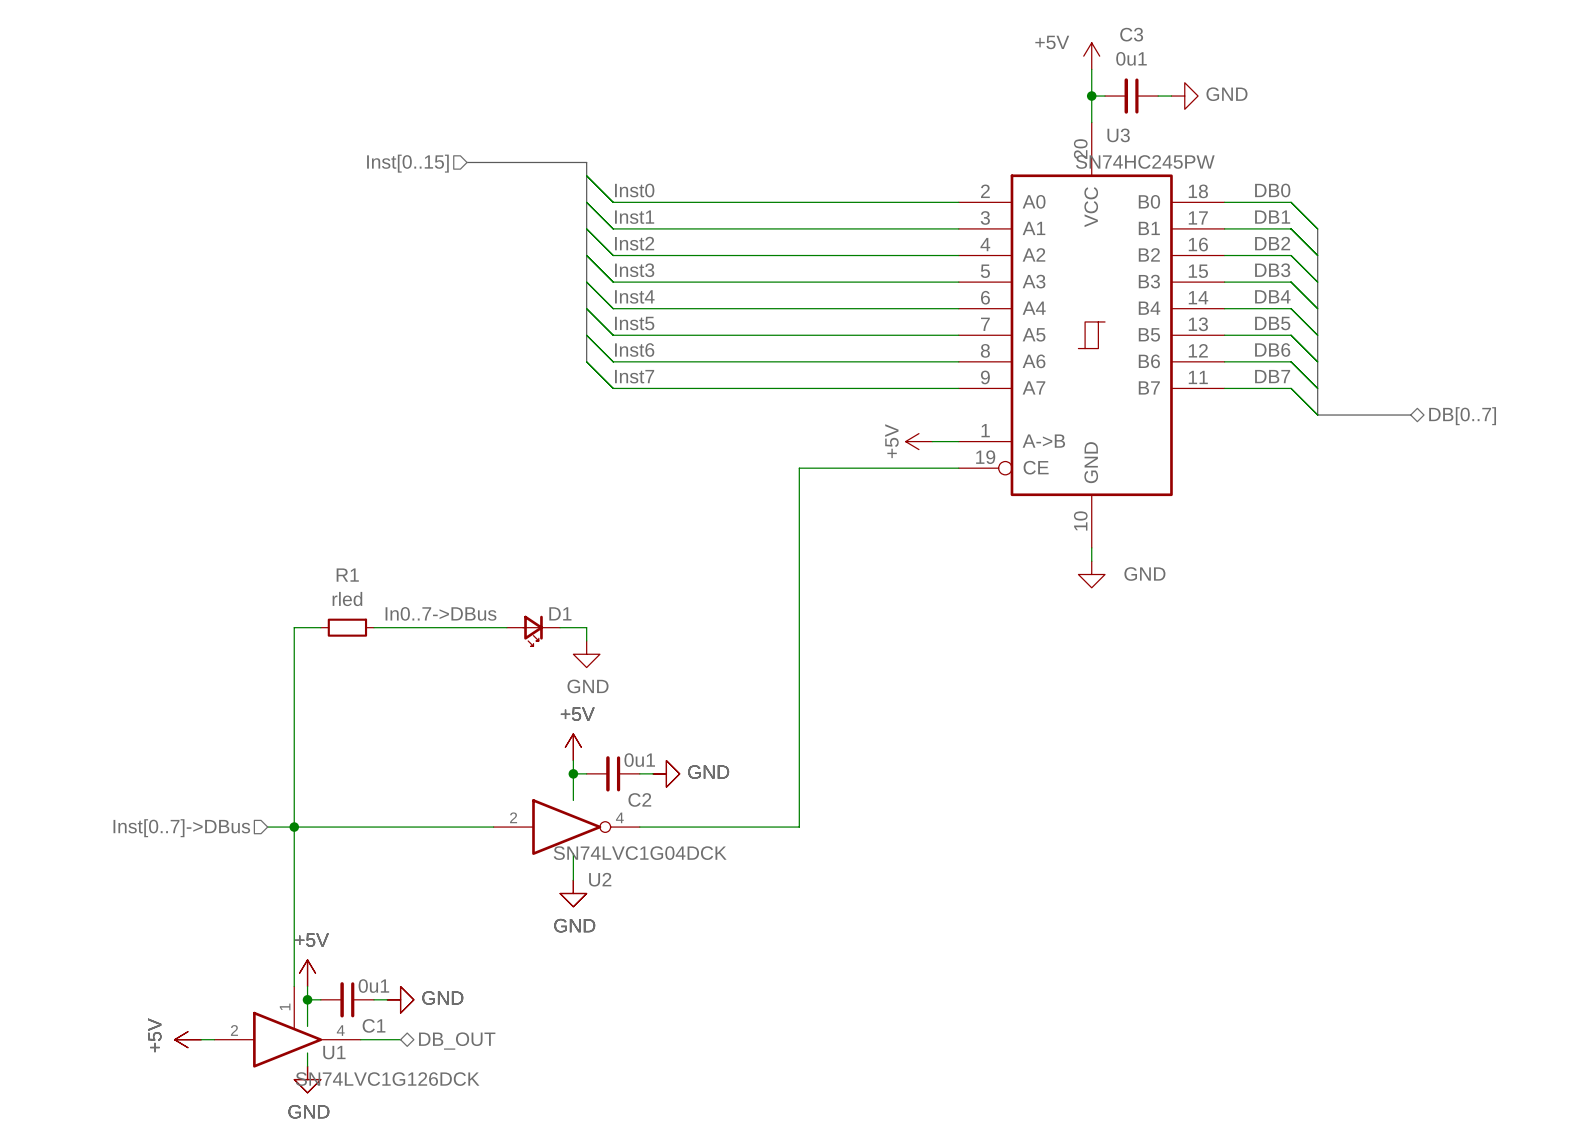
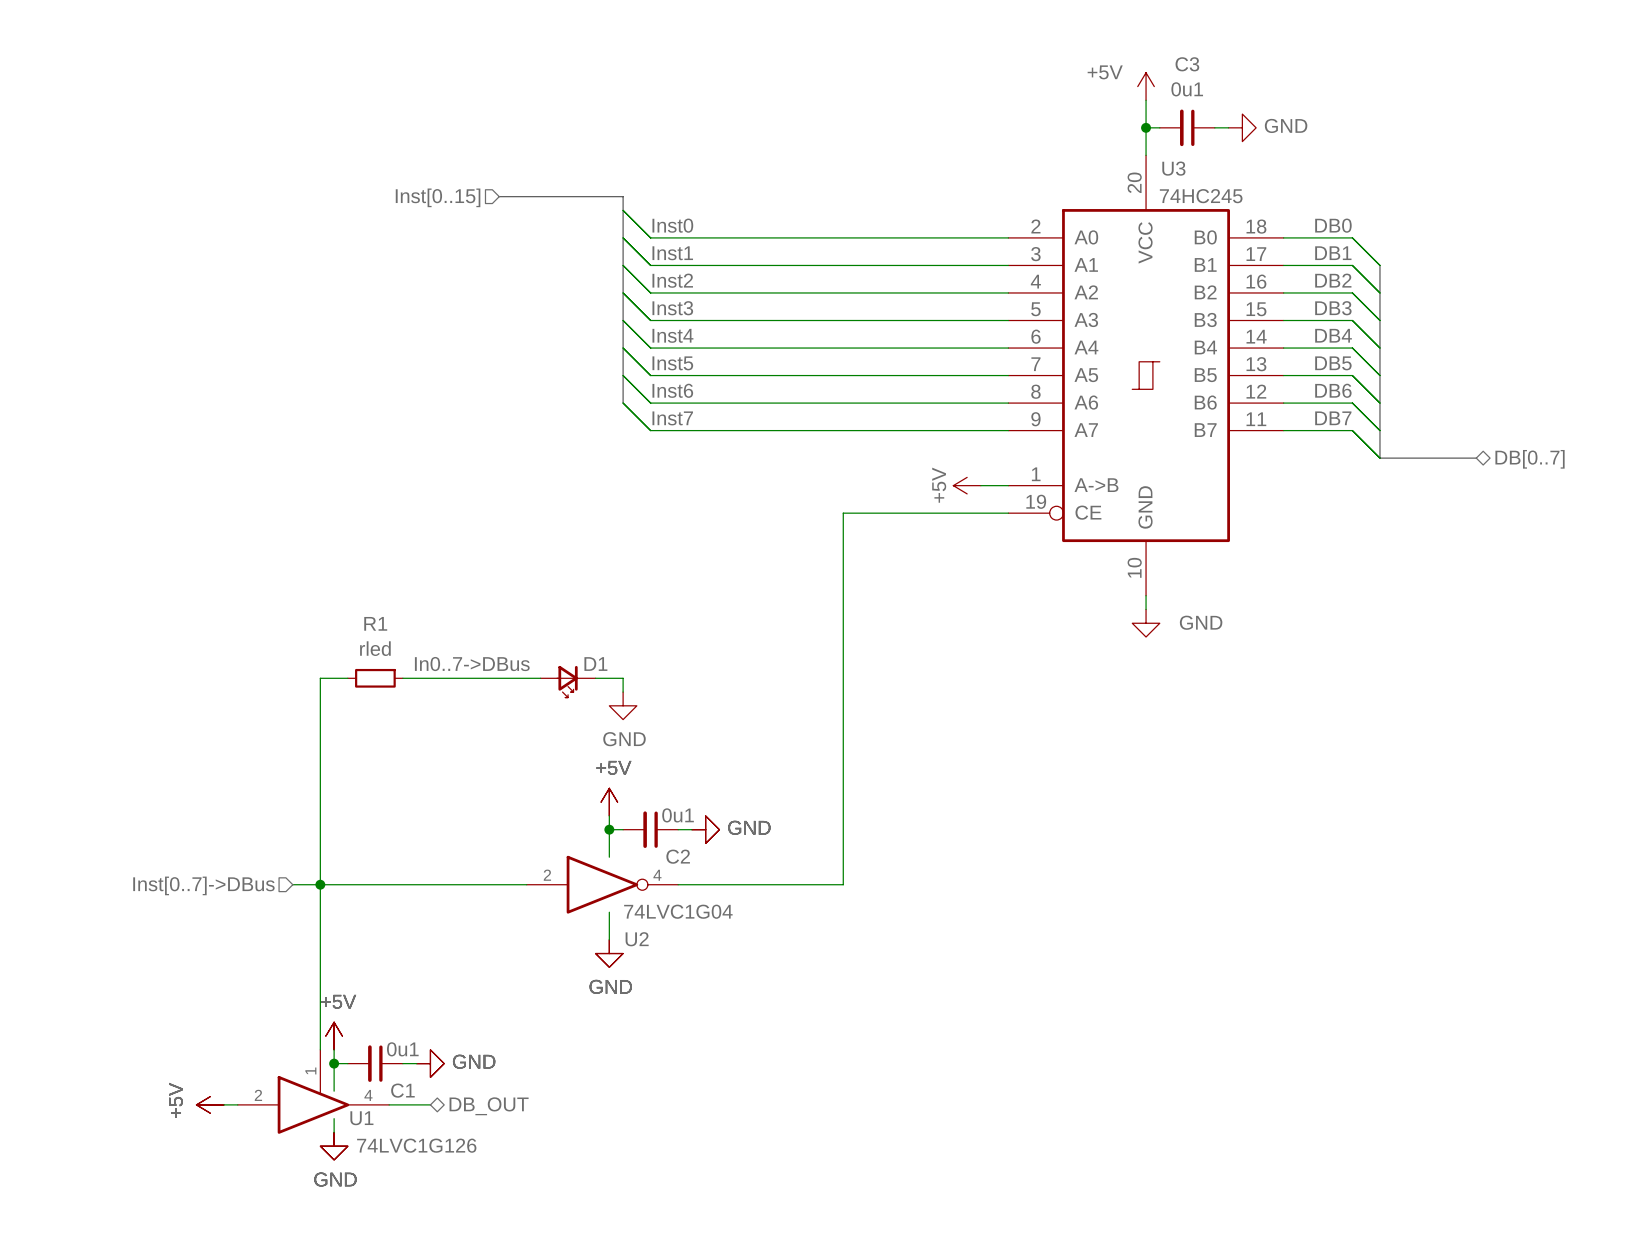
U3 value: SN74HC245PW (1145, 161) -> 74HC245 (1201, 196)
U2 value: SN74LVC1G04DCK (640, 853) -> 74LVC1G04 (678, 911)
U1 value: SN74LVC1G126DCK (387, 1079) -> 74LVC1G126 (416, 1145)

